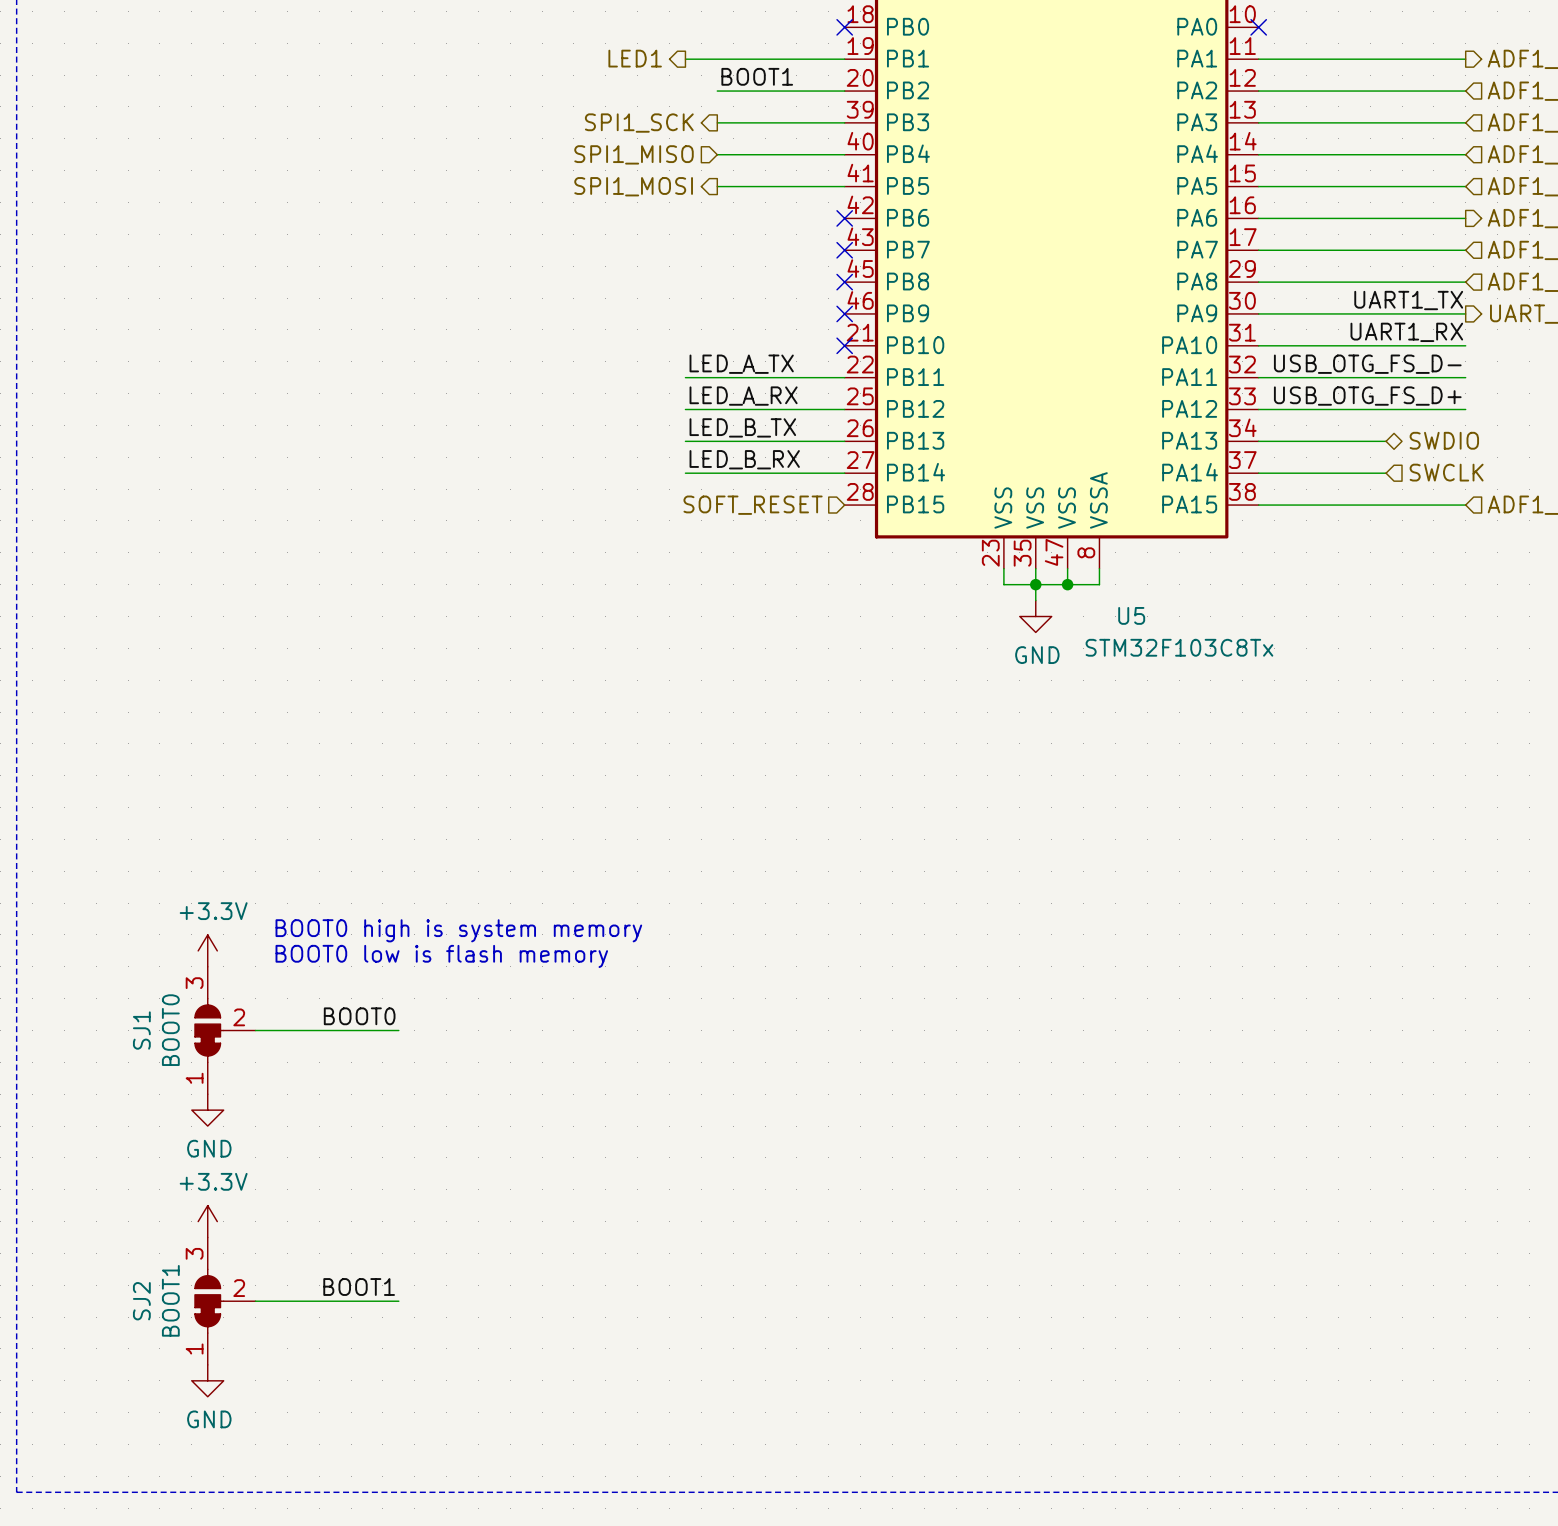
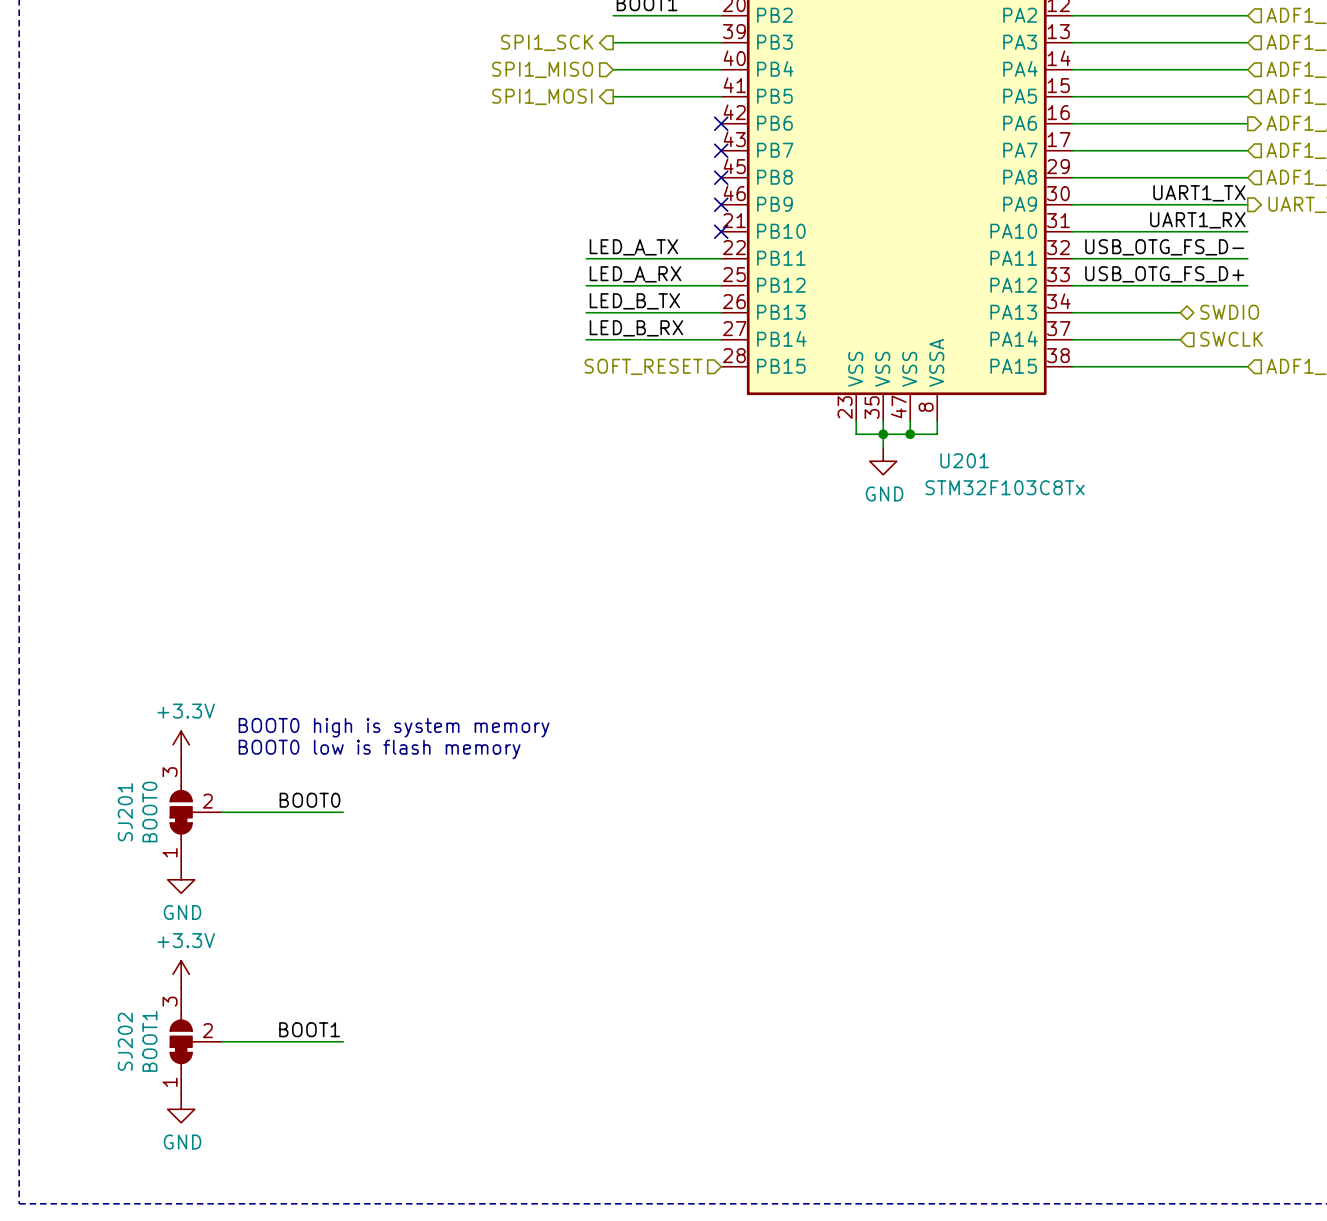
U5 name: U5 (1131, 615) -> U201 (964, 460)
SJ1 name: SJ1 (141, 1030) -> SJ201 (125, 812)
SJ2 name: SJ2 (141, 1301) -> SJ202 (125, 1041)

